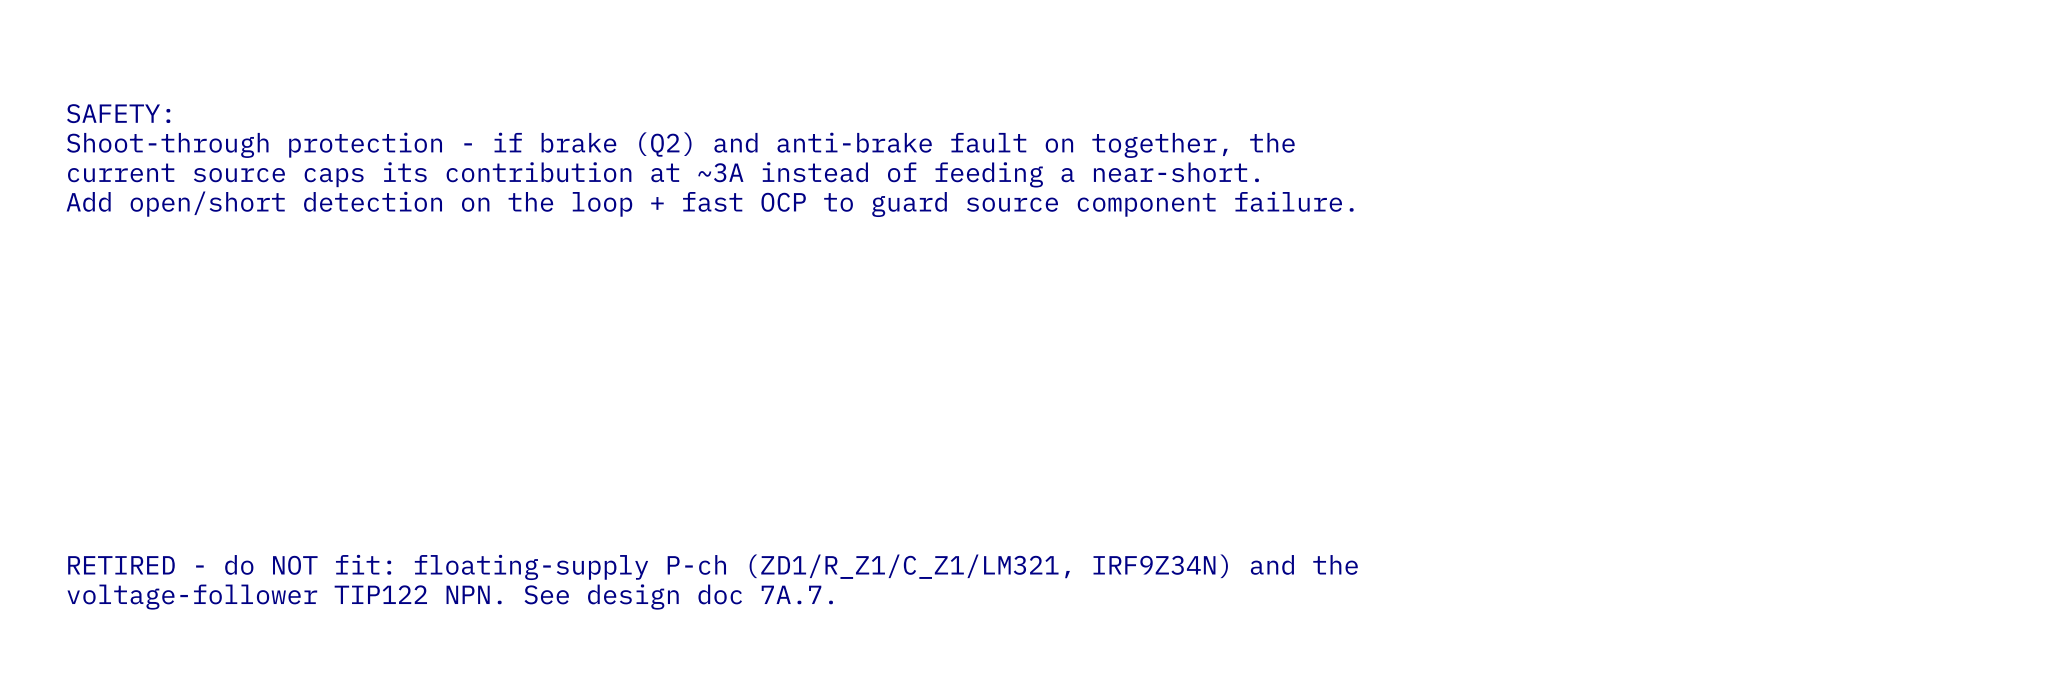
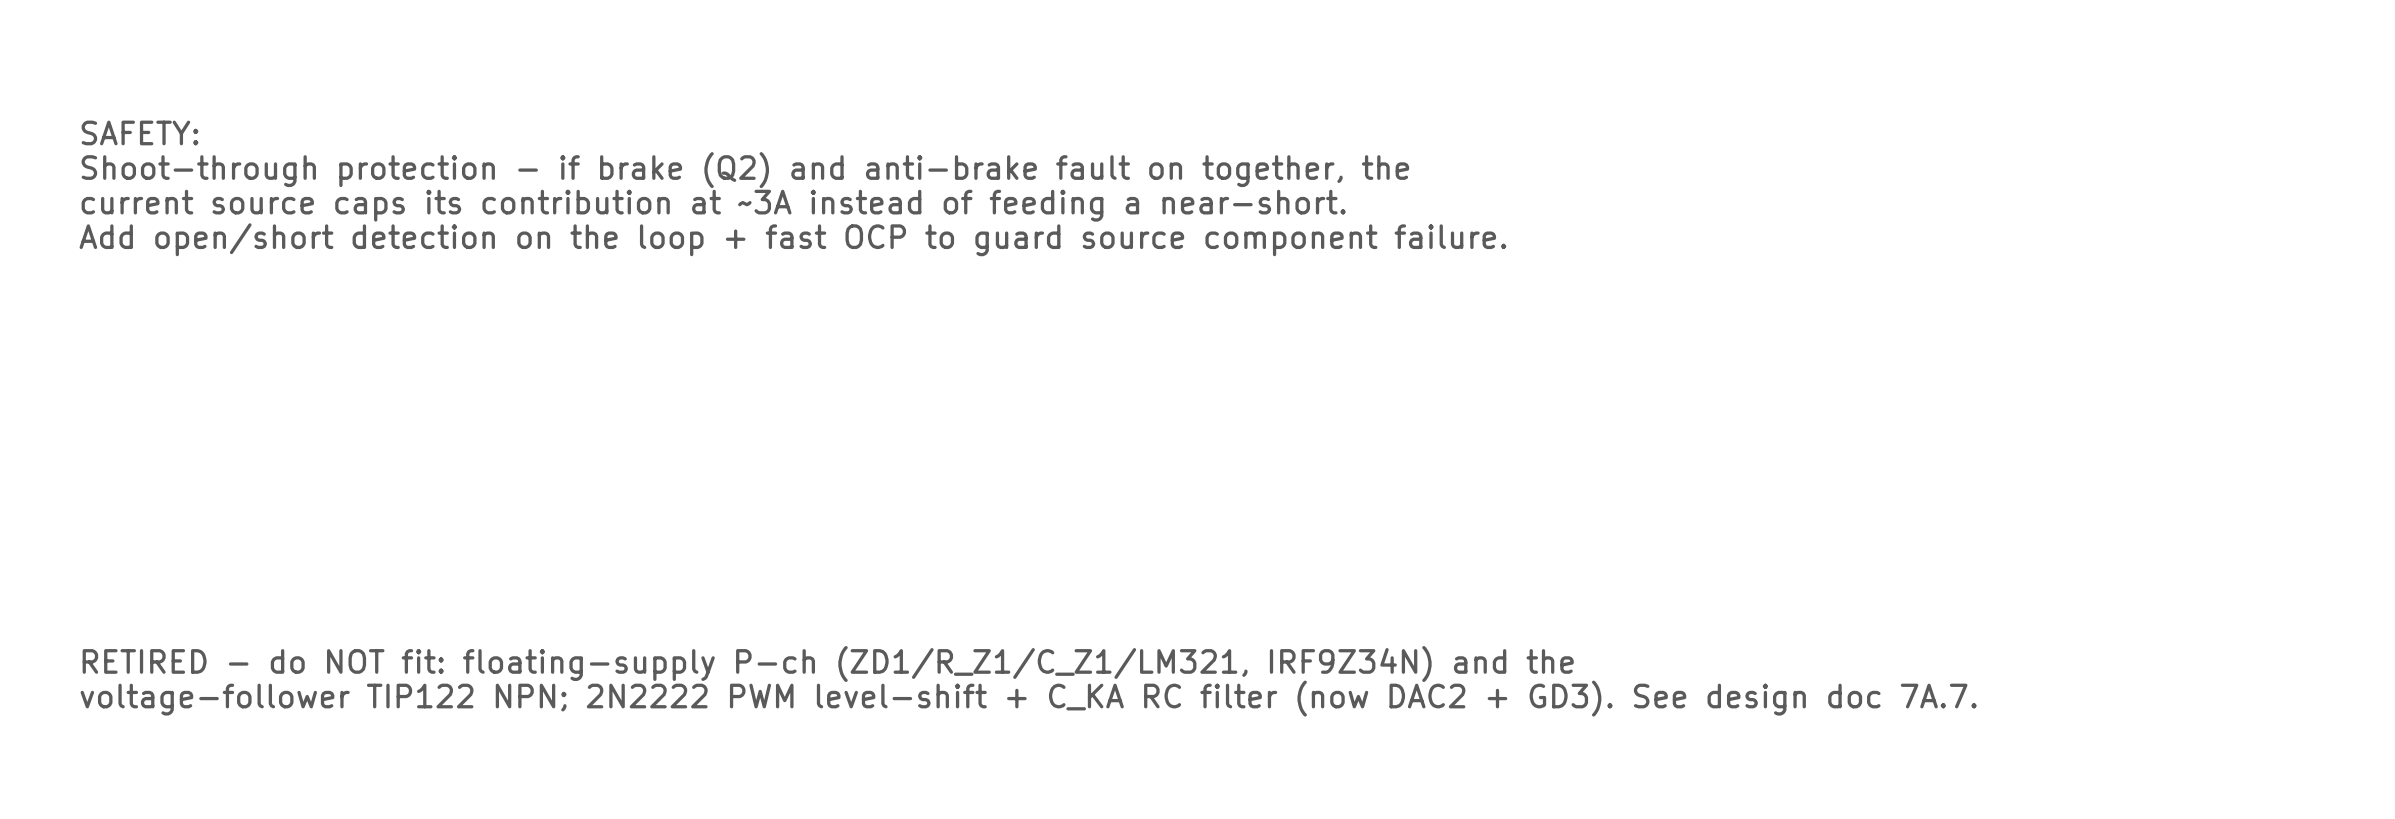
text: voltage-follower TIP122 NPN. See design doc 7A.7. (450, 596) -> voltage-follower TIP122 NPN; 2N2222 PWM level-shift + C_KA RC filter (now DAC2 + GD3). See design doc 7A.7. (1028, 698)

